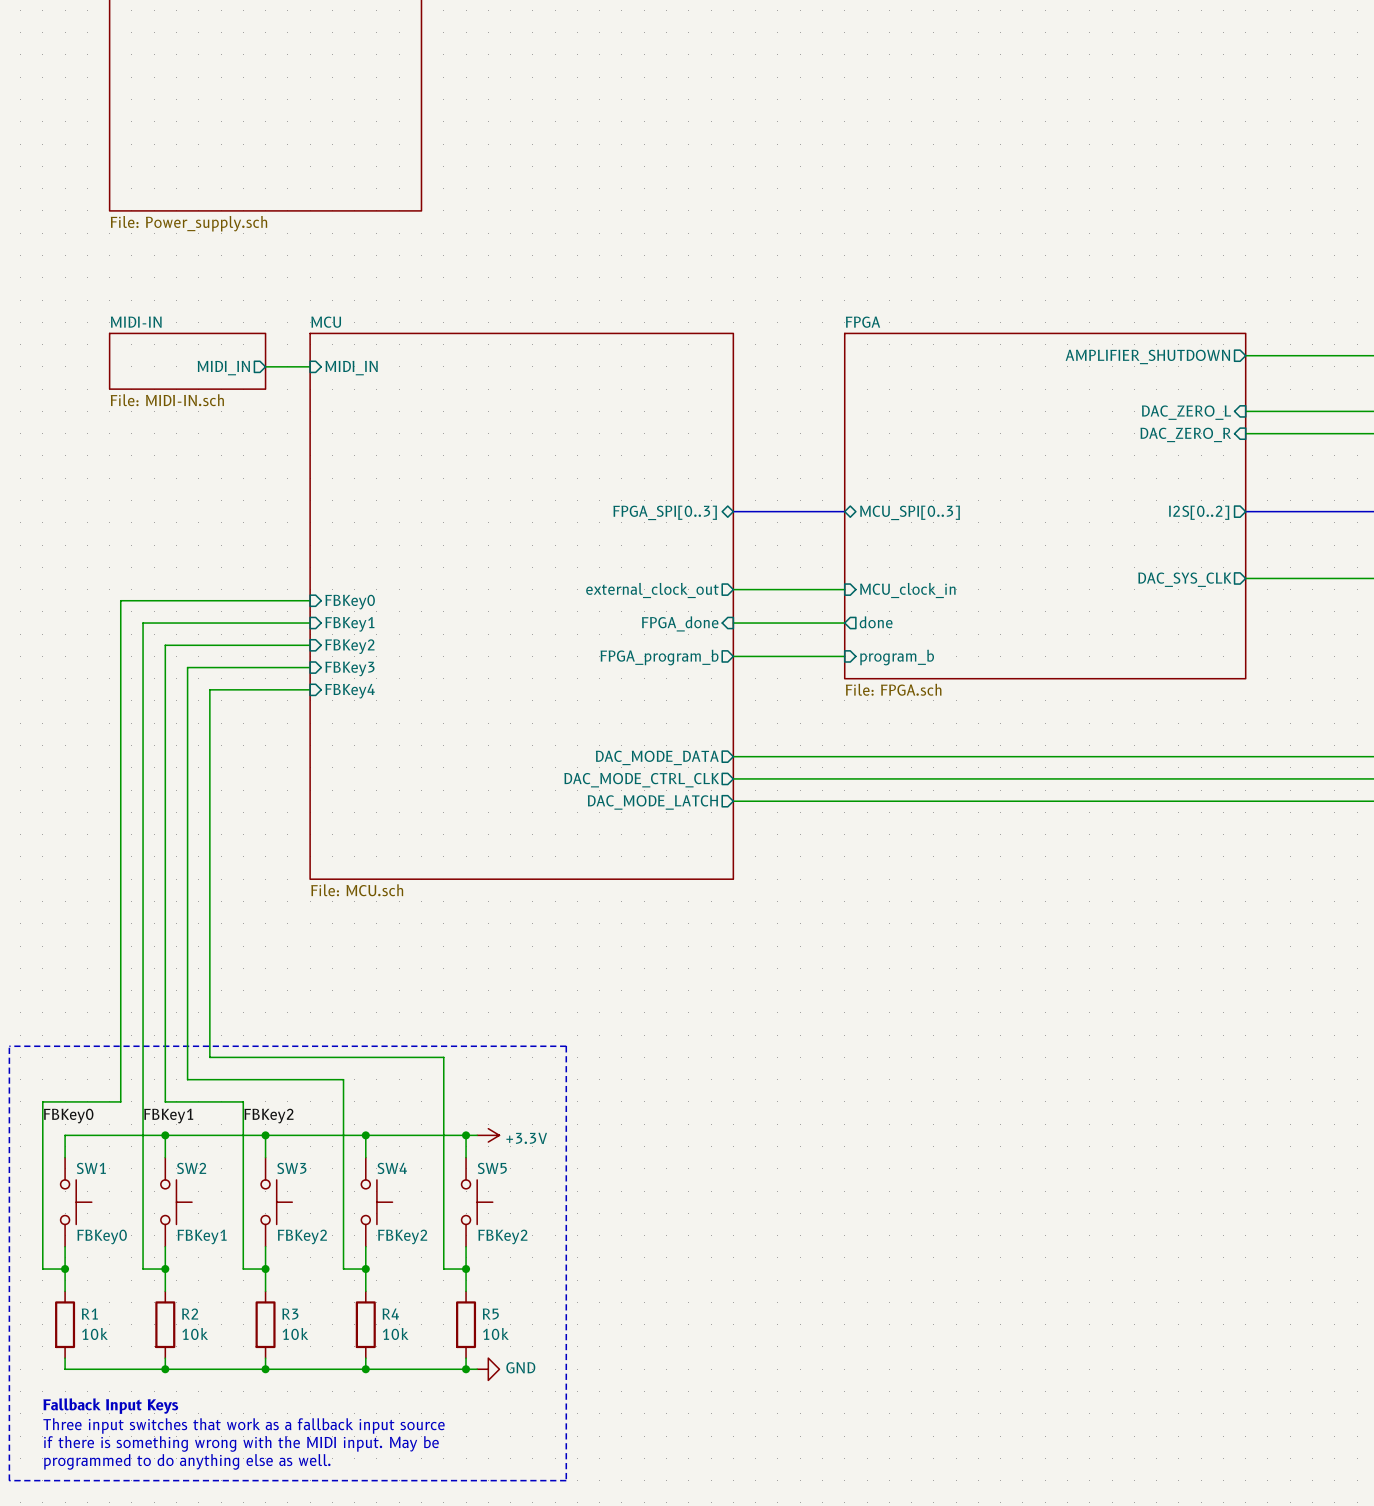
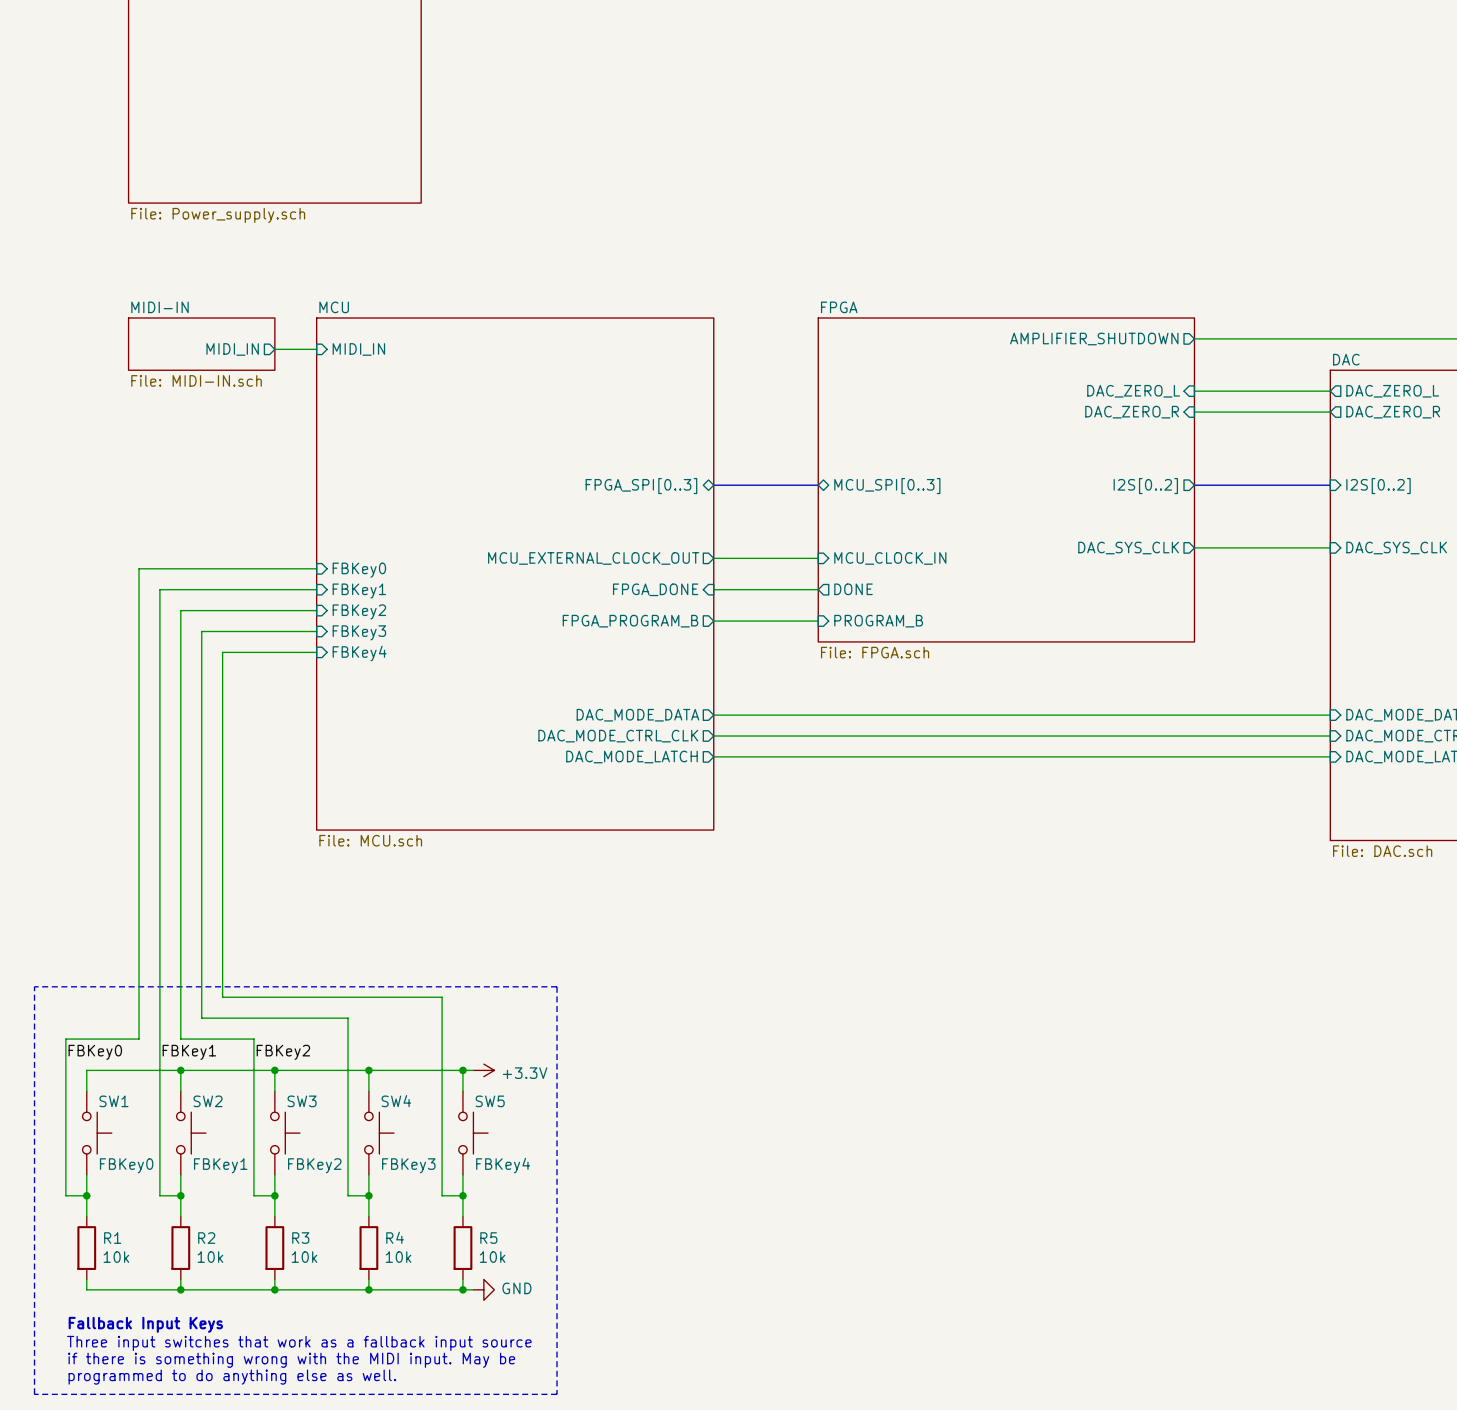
sheet pin: external_clock_out (652, 590) -> MCU_EXTERNAL_CLOCK_OUT (593, 558)
sheet pin: MCU_clock_in (907, 590) -> MCU_CLOCK_IN (890, 558)
sheet pin: done (876, 622) -> DONE (853, 589)
sheet pin: FPGA_done (680, 623) -> FPGA_DONE (655, 589)
sheet pin: FPGA_program_b (659, 657) -> FPGA_PROGRAM_B (630, 621)
sheet pin: program_b (897, 657) -> PROGRAM_B (878, 621)
SW4 value: FBKey2 (402, 1236) -> FBKey3 (408, 1165)
SW5 value: FBKey2 (502, 1236) -> FBKey4 (503, 1165)

